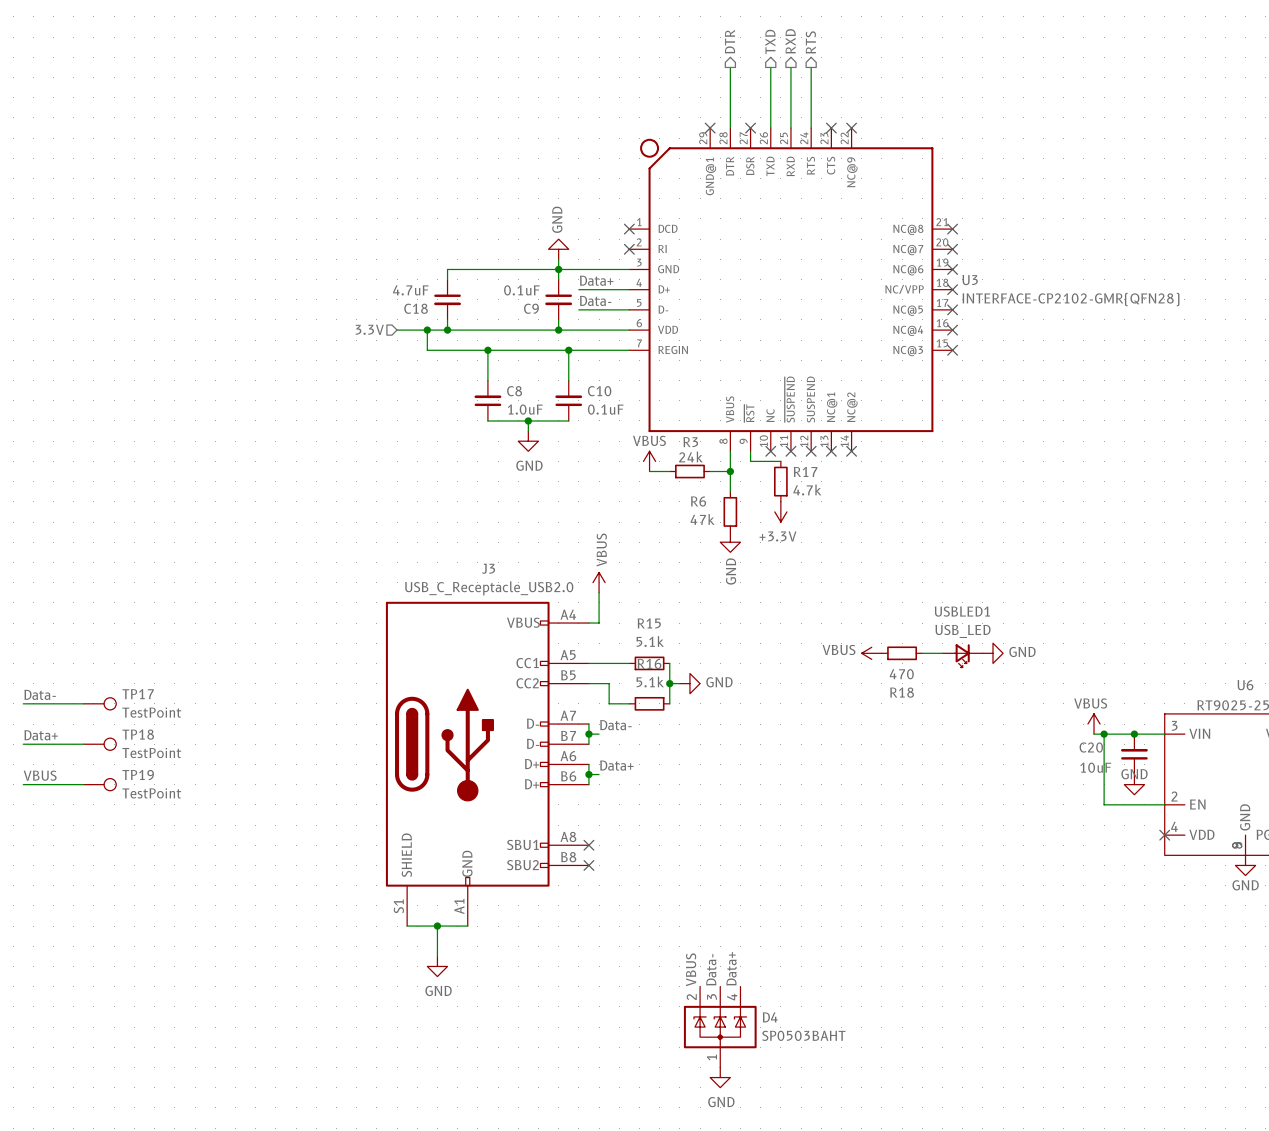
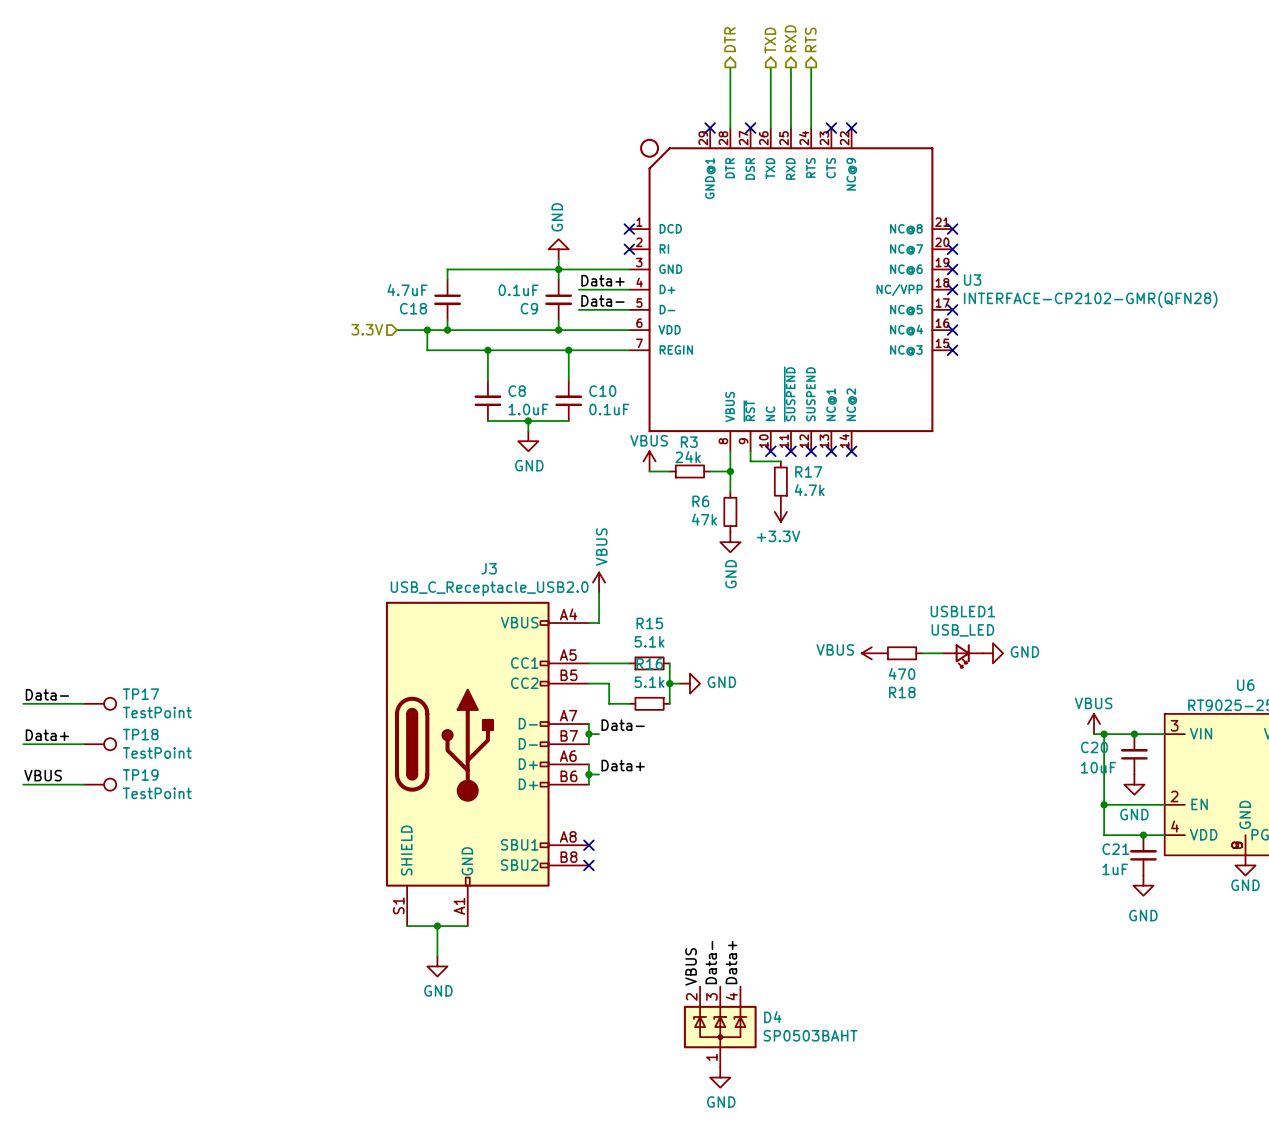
power symbol text position: GND (1134, 774) -> GND (1134, 814)
wire: none -> (1104, 804) (1104, 835) (1164, 835)
junction: none -> (1104, 804)
junction: none -> (1143, 835)
no-connect mark: (1164, 835) -> none
C21: none -> 1uF (1143, 855)
power symbol: none -> GND (1143, 885)

